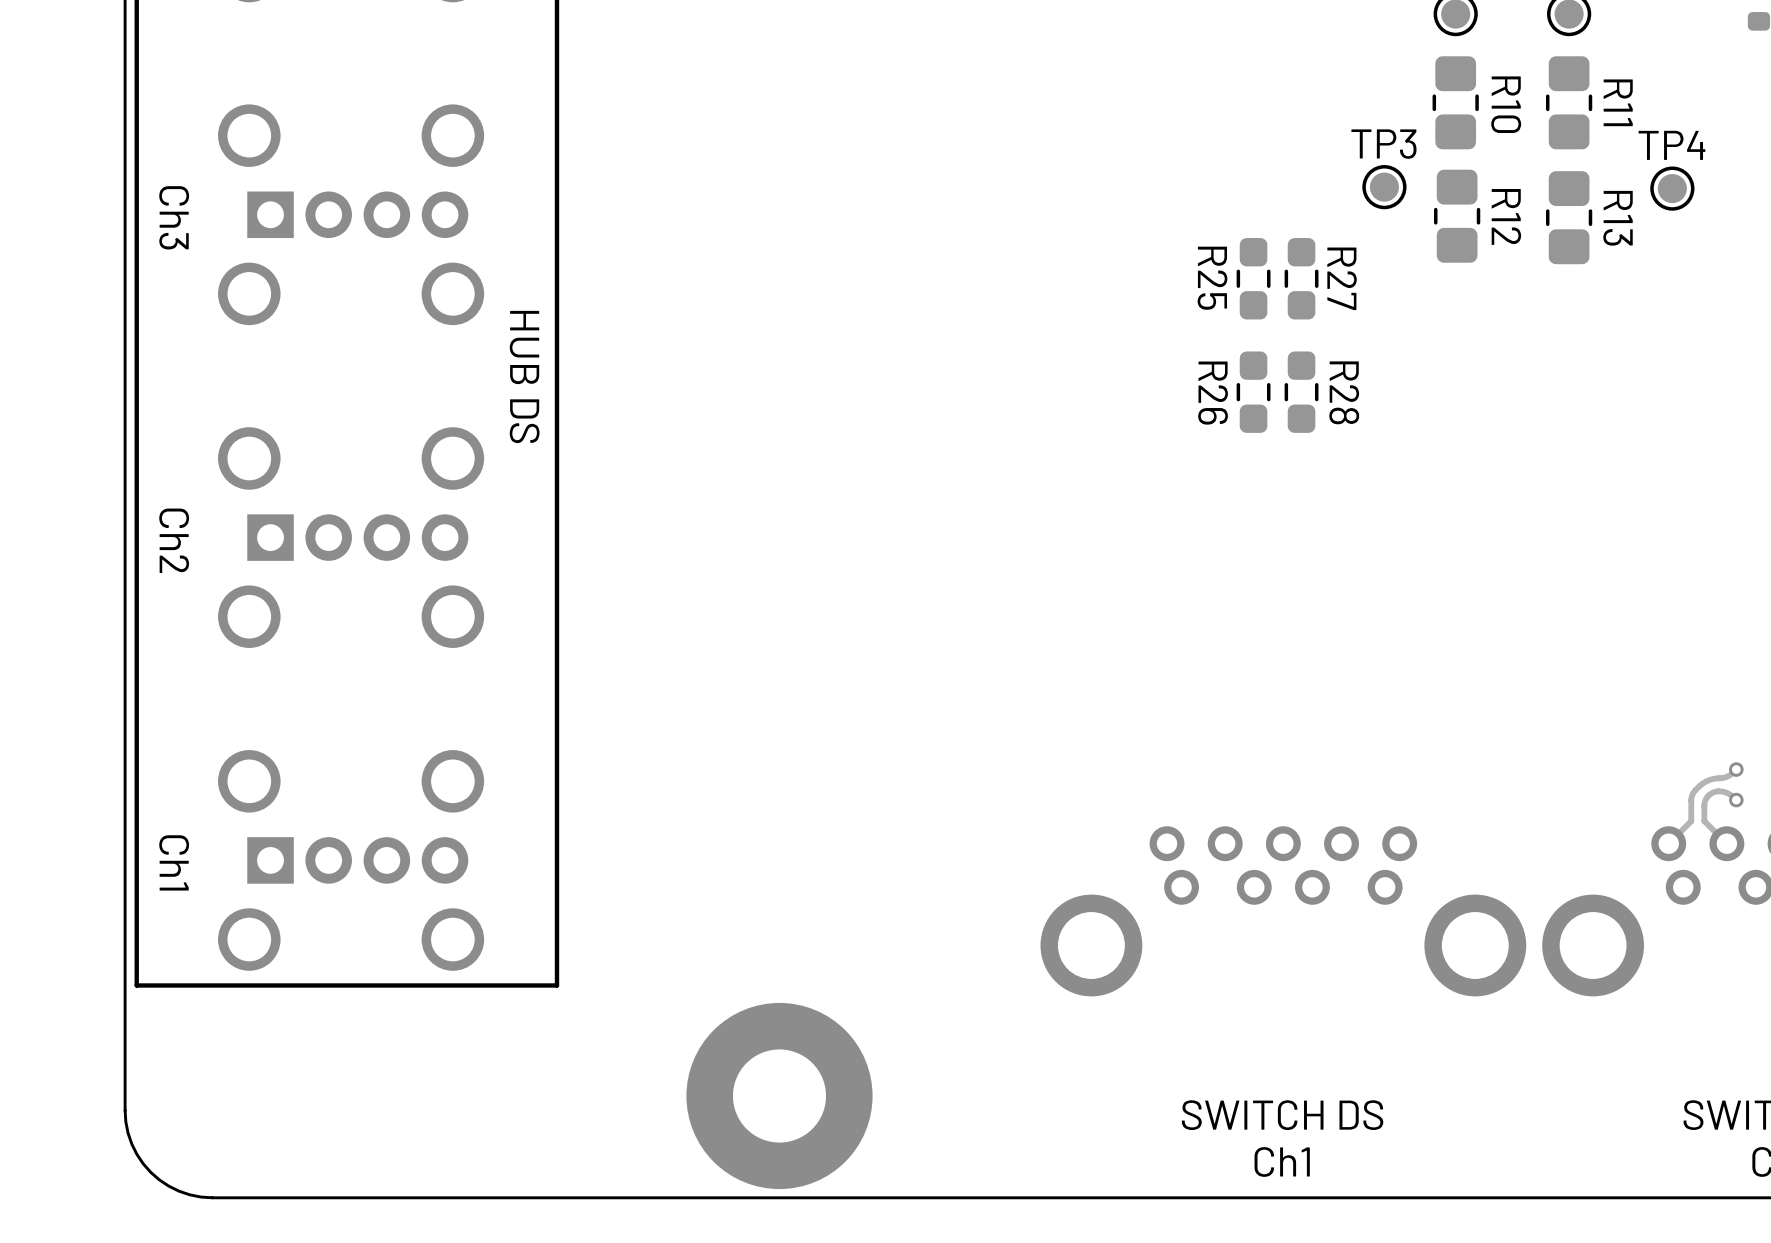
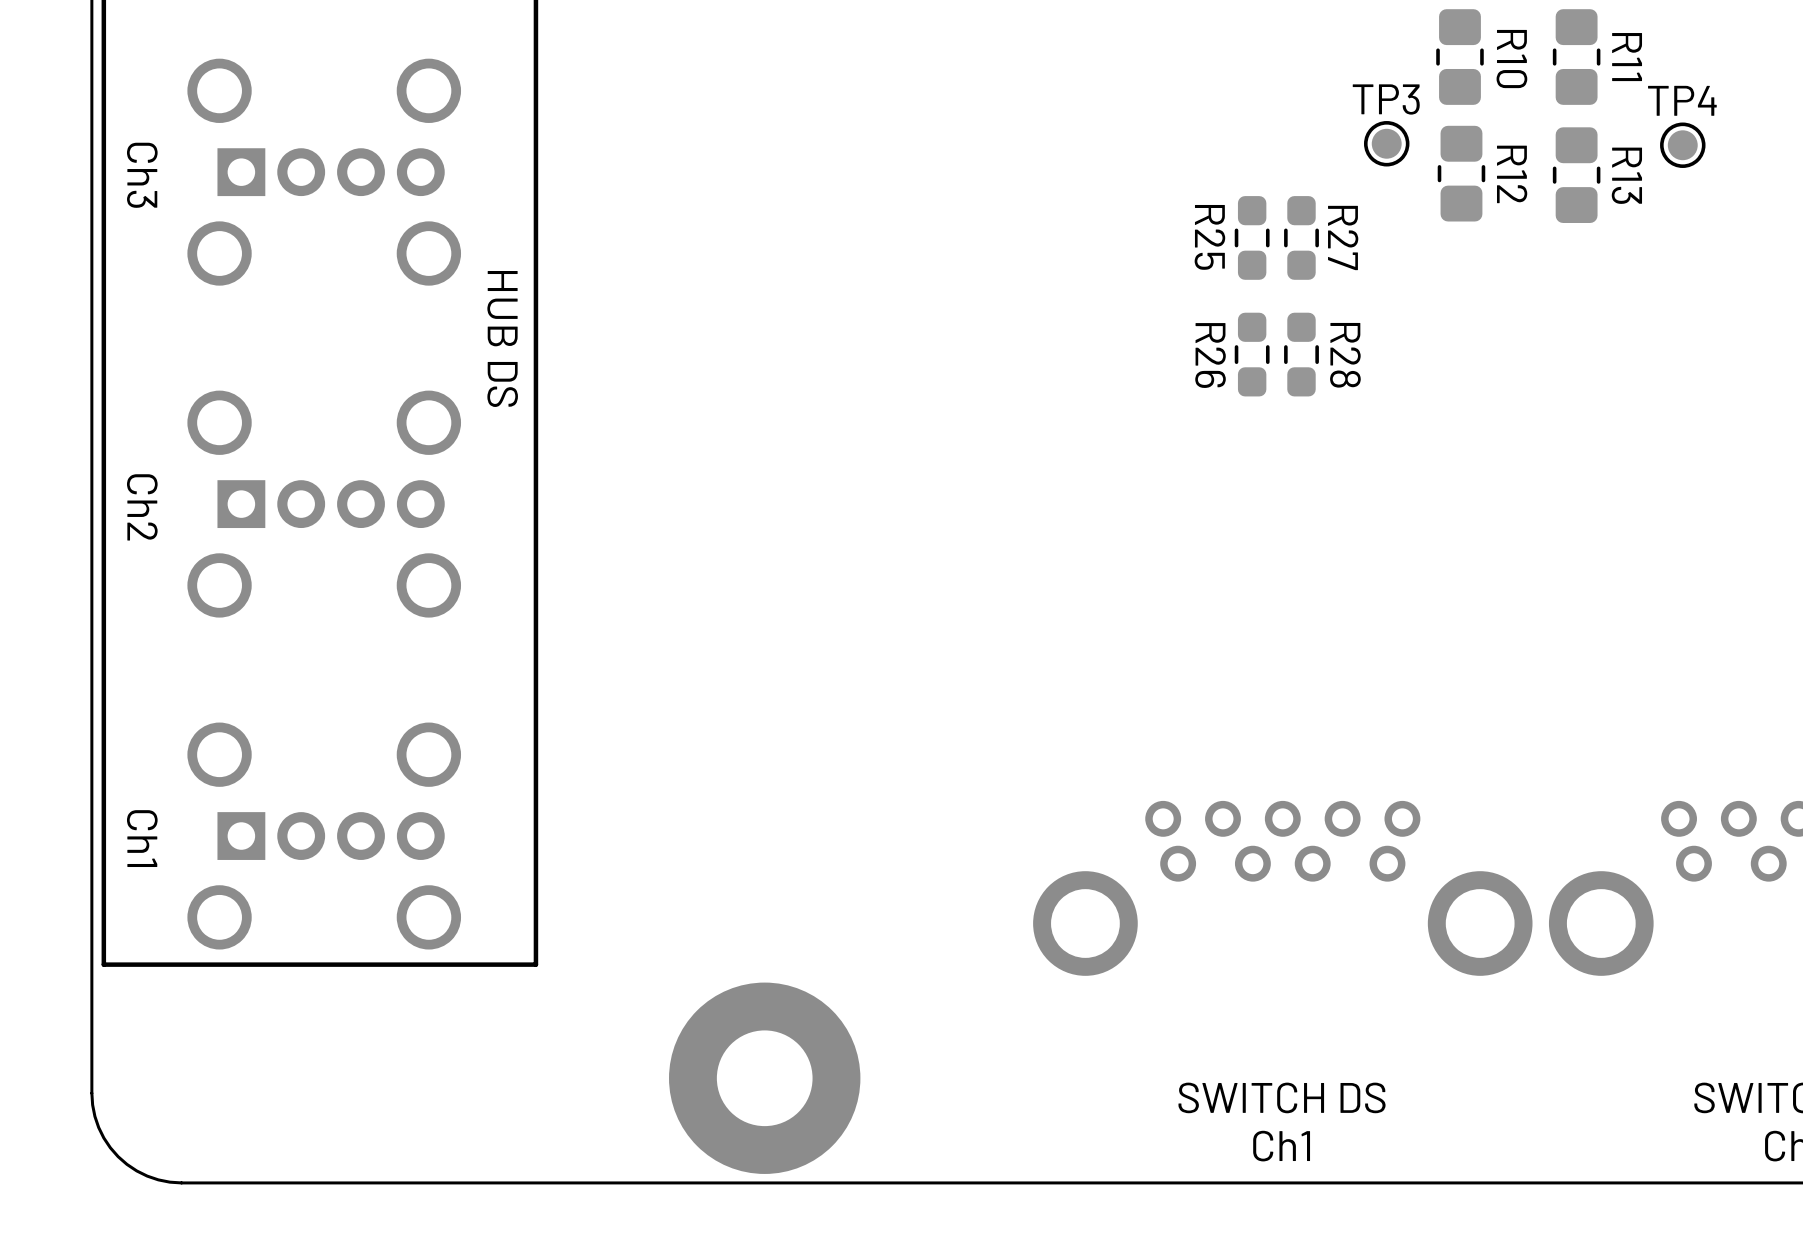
track: (1736, 769) (1727, 776) (1705, 781) (1695, 790) (1691, 798) (1691, 821) (1668, 843) -> none
via: (1736, 769) -> none
track: (1736, 800) (1726, 792) (1717, 791) (1708, 795) (1704, 803) (1704, 821) (1726, 843) -> none
via: (1736, 800) -> none

